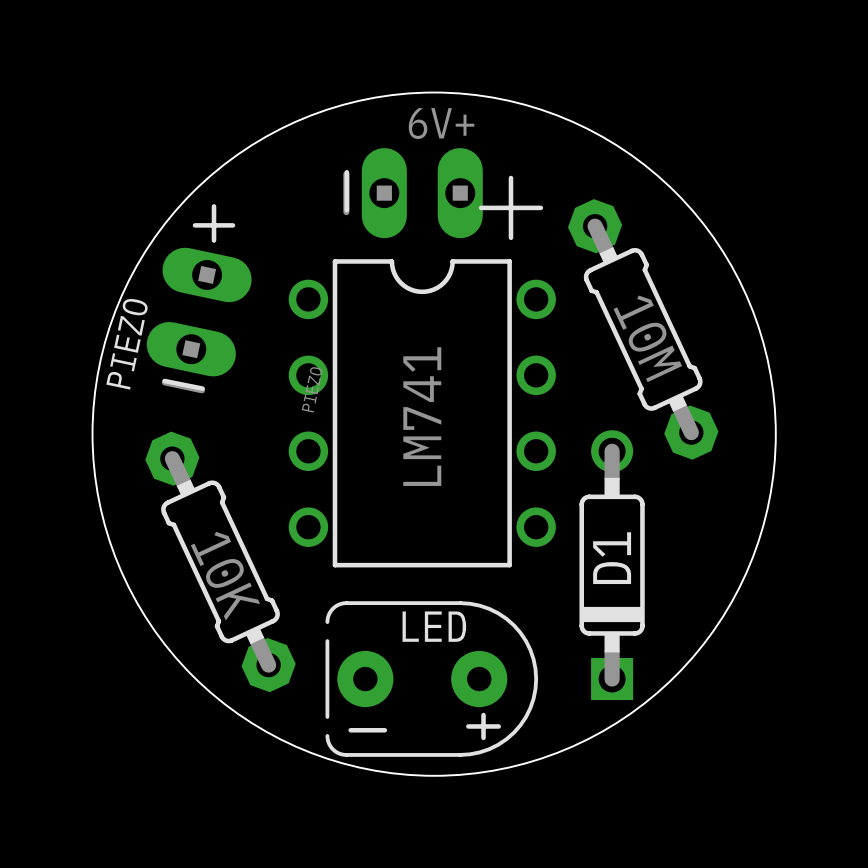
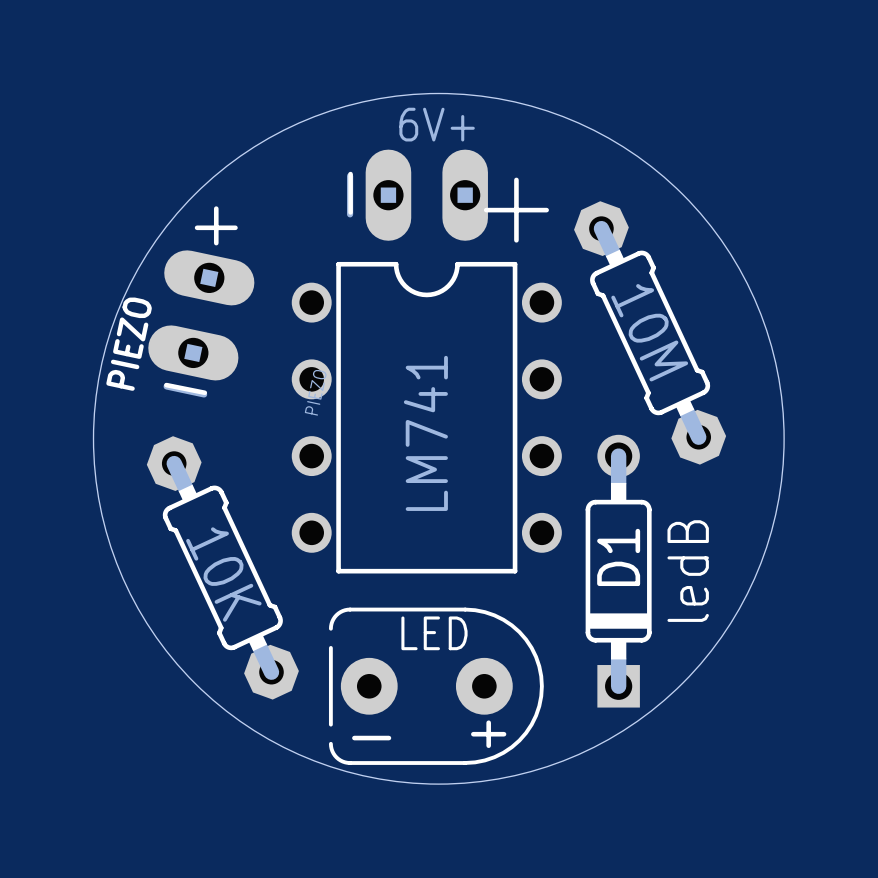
text: none -> ledB (688, 571)

